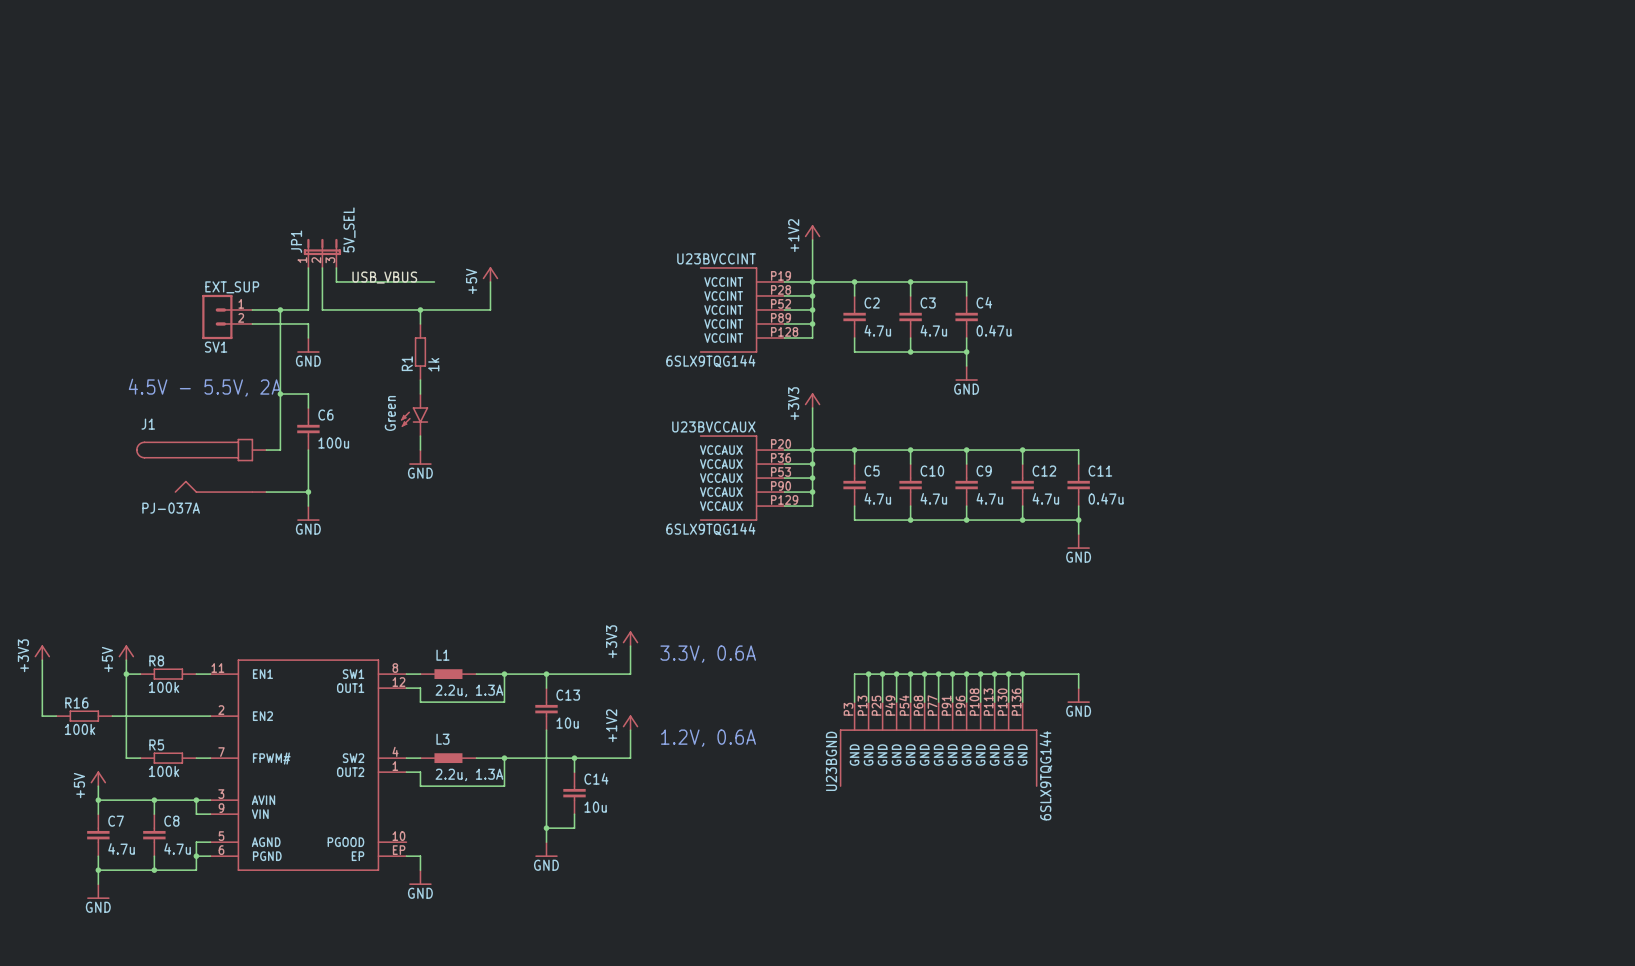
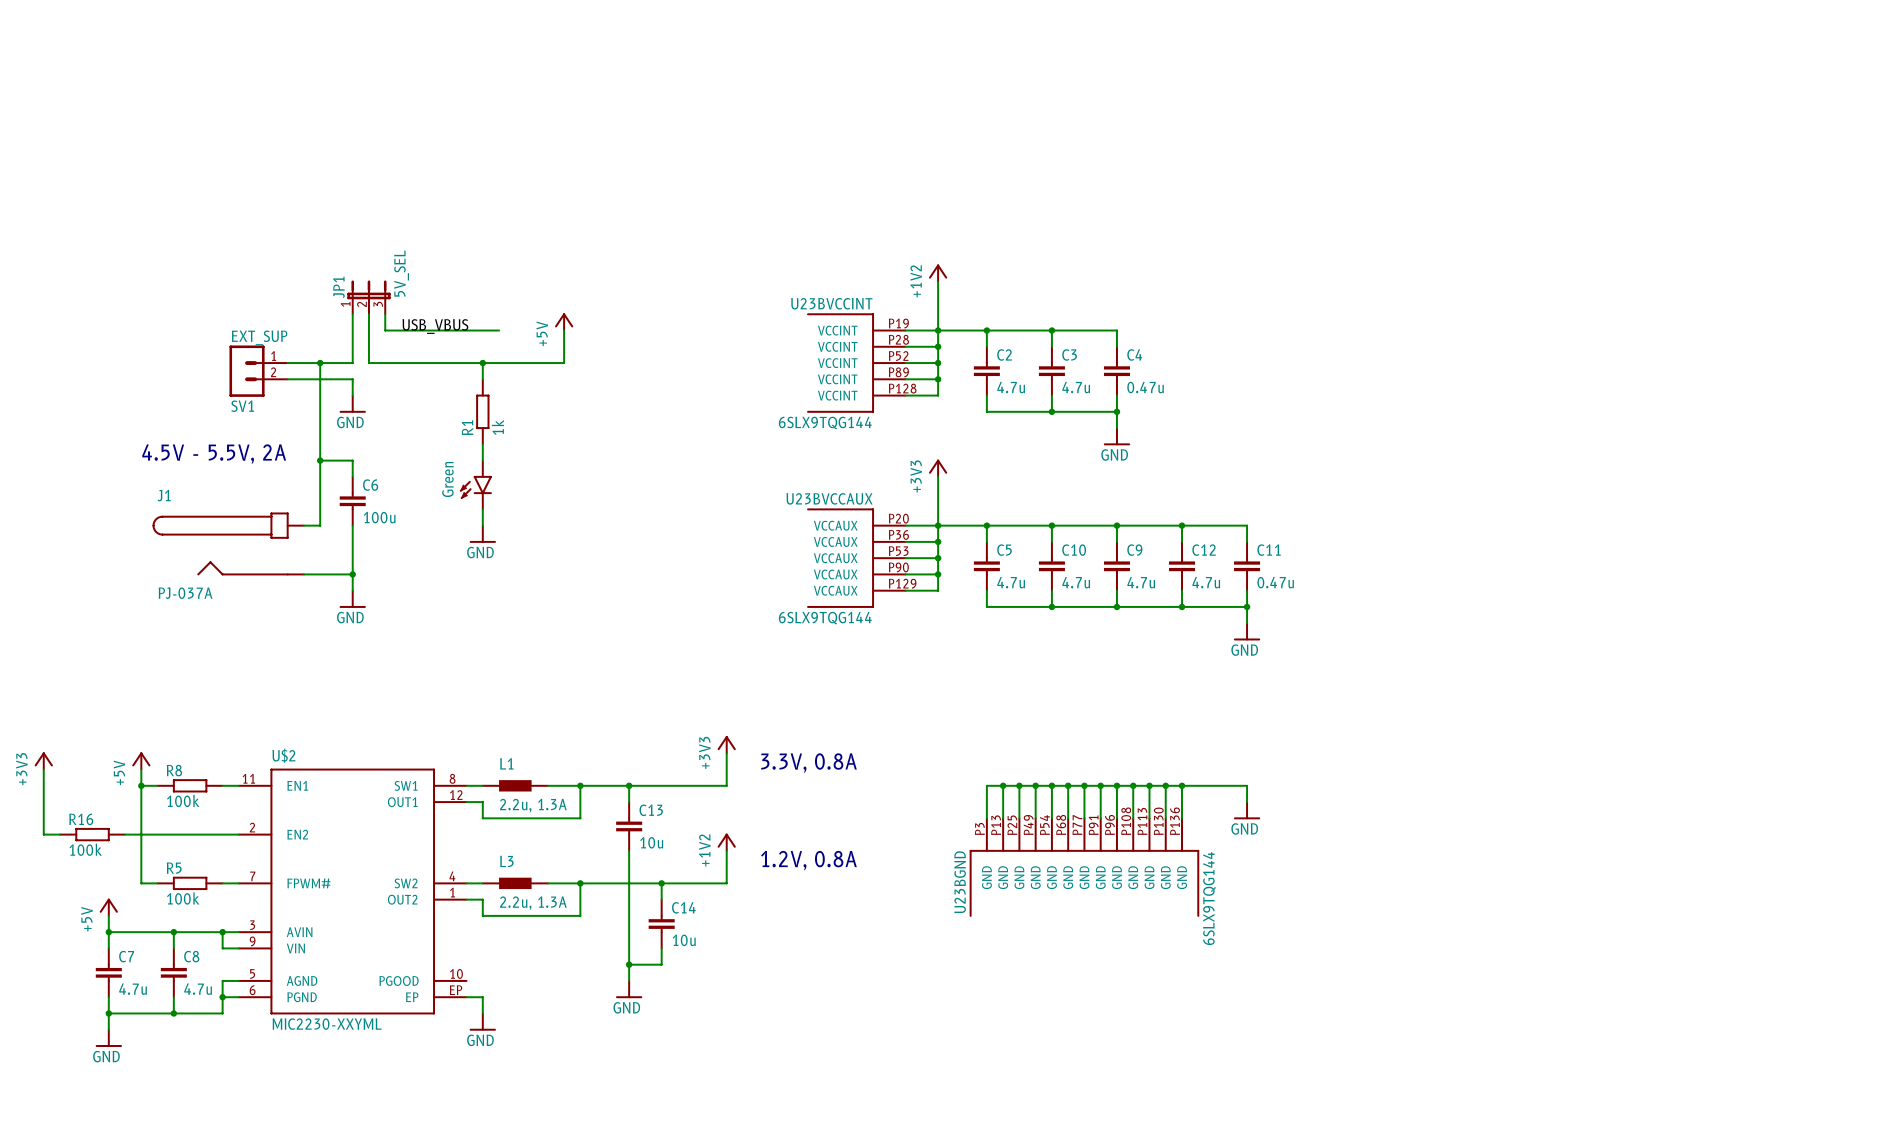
U$2 name: none -> U$2 (283, 755)
text: 3.3V, 0.6A (708, 654) -> 3.3V, 0.8A (808, 763)
text: 1.2V, 0.6A (708, 738) -> 1.2V, 0.8A (808, 860)
U$2 value: none -> MIC2230-XXYML (327, 1024)

